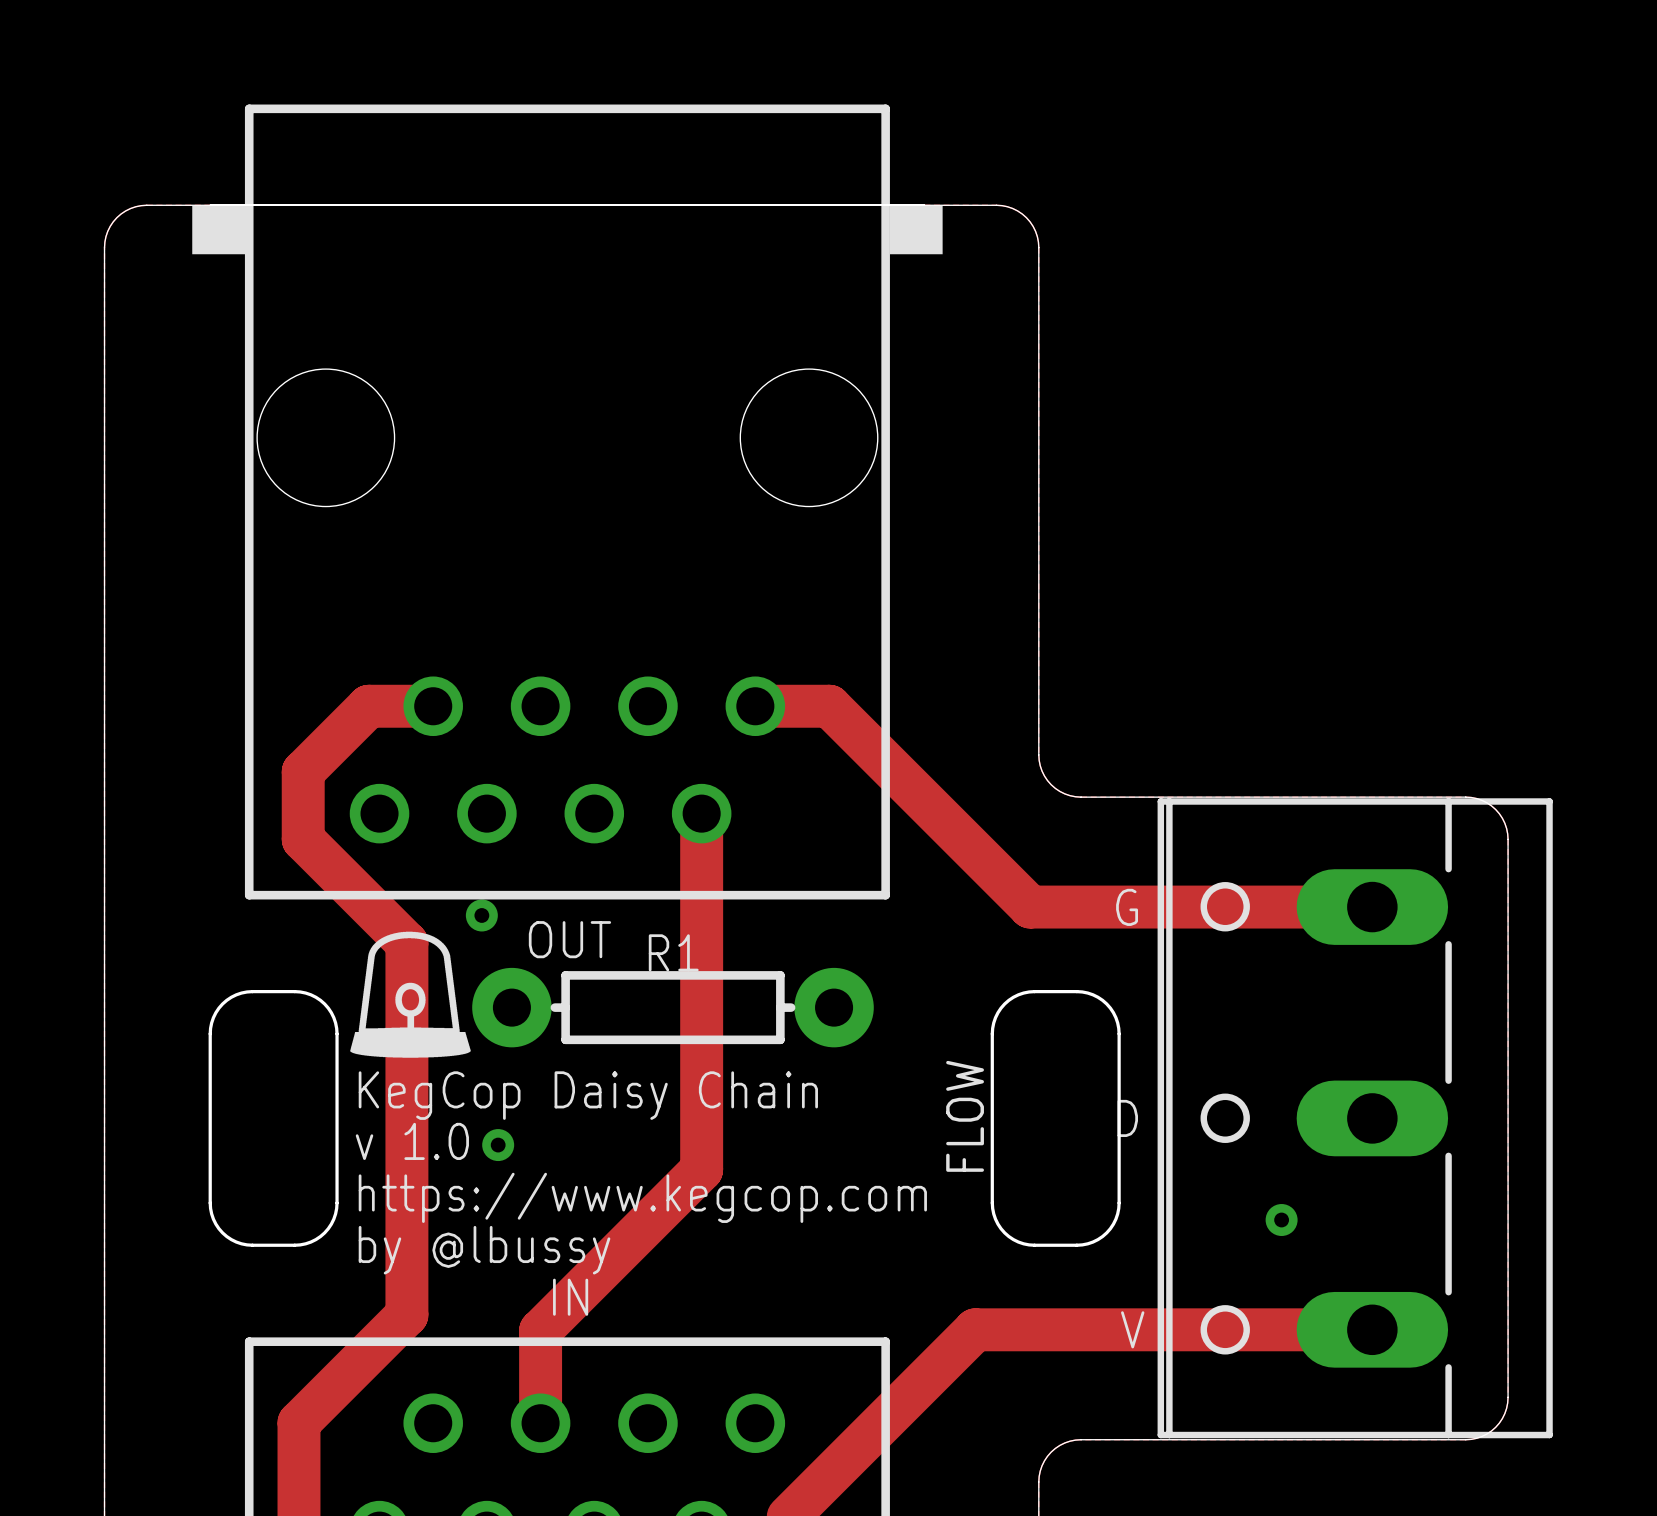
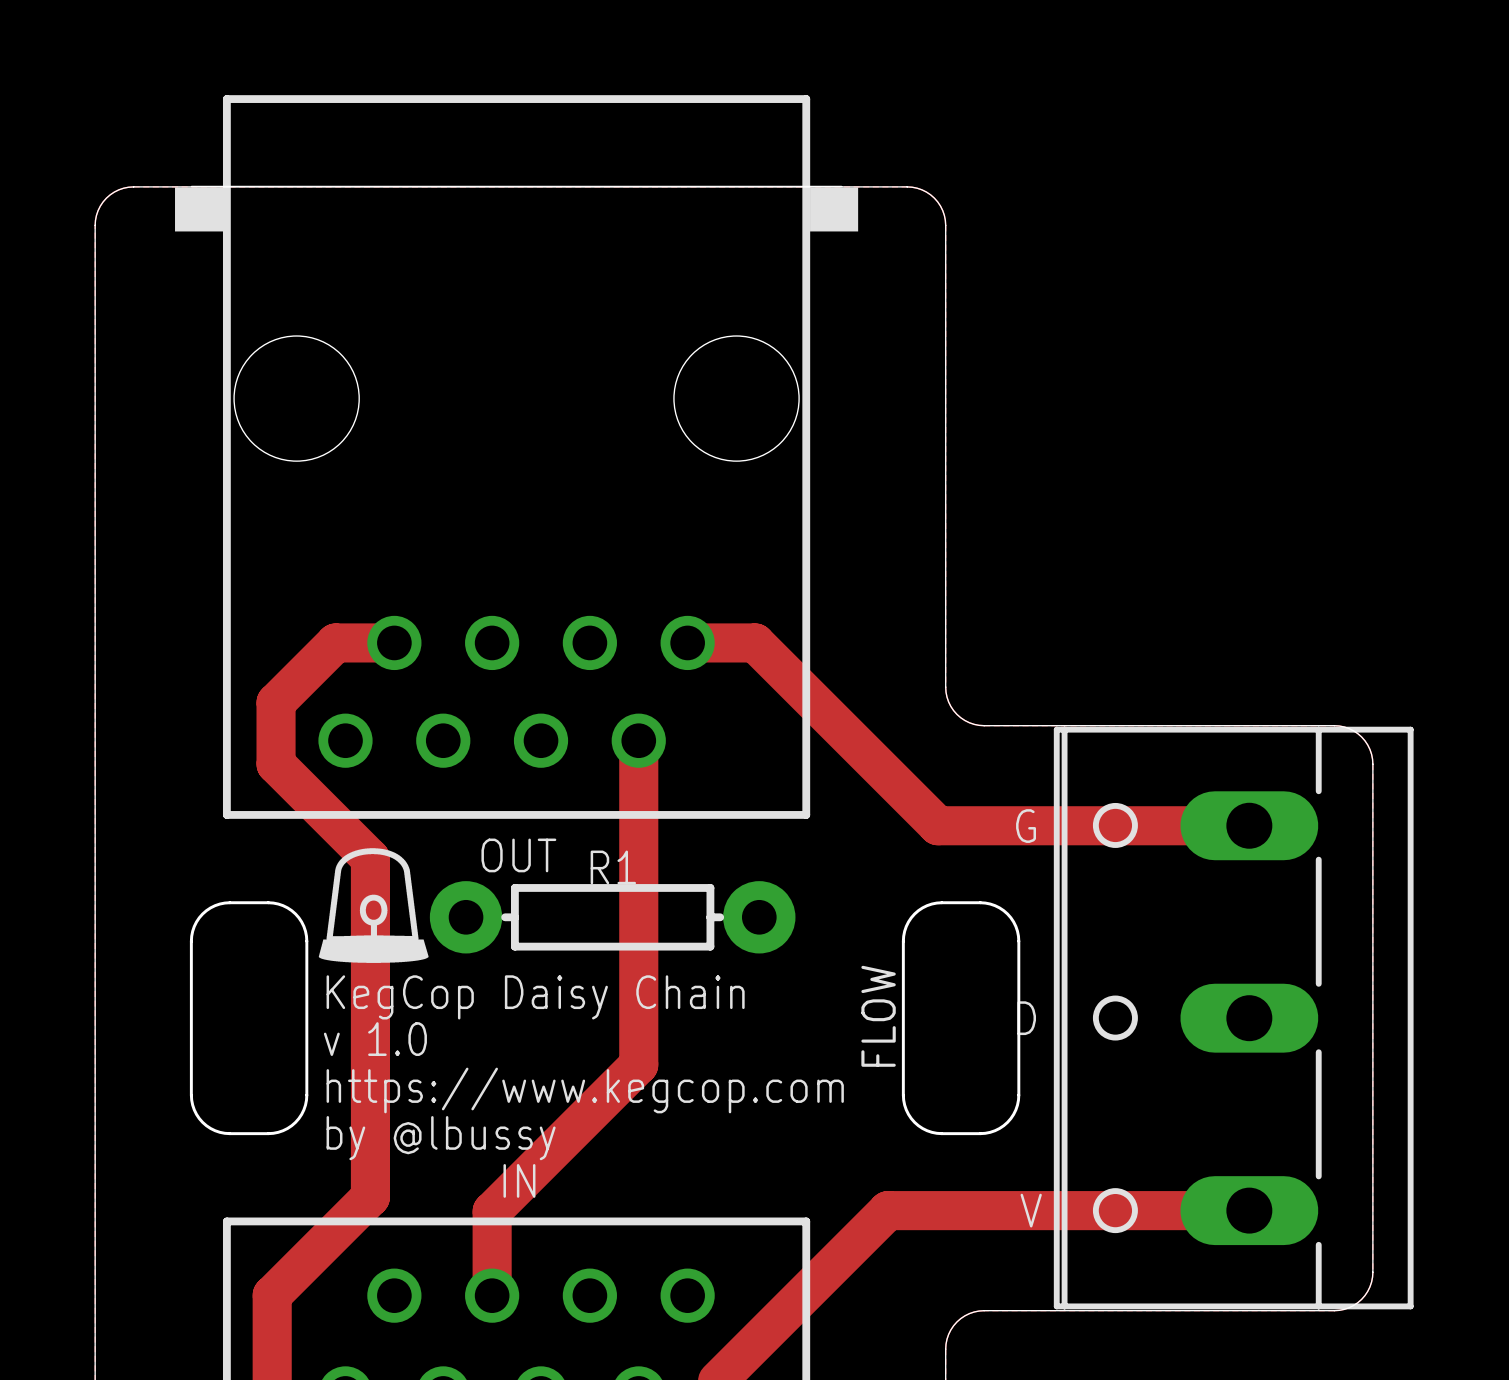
via: (481, 915) -> none
via: (498, 1145) -> none
via: (1281, 1220) -> none

